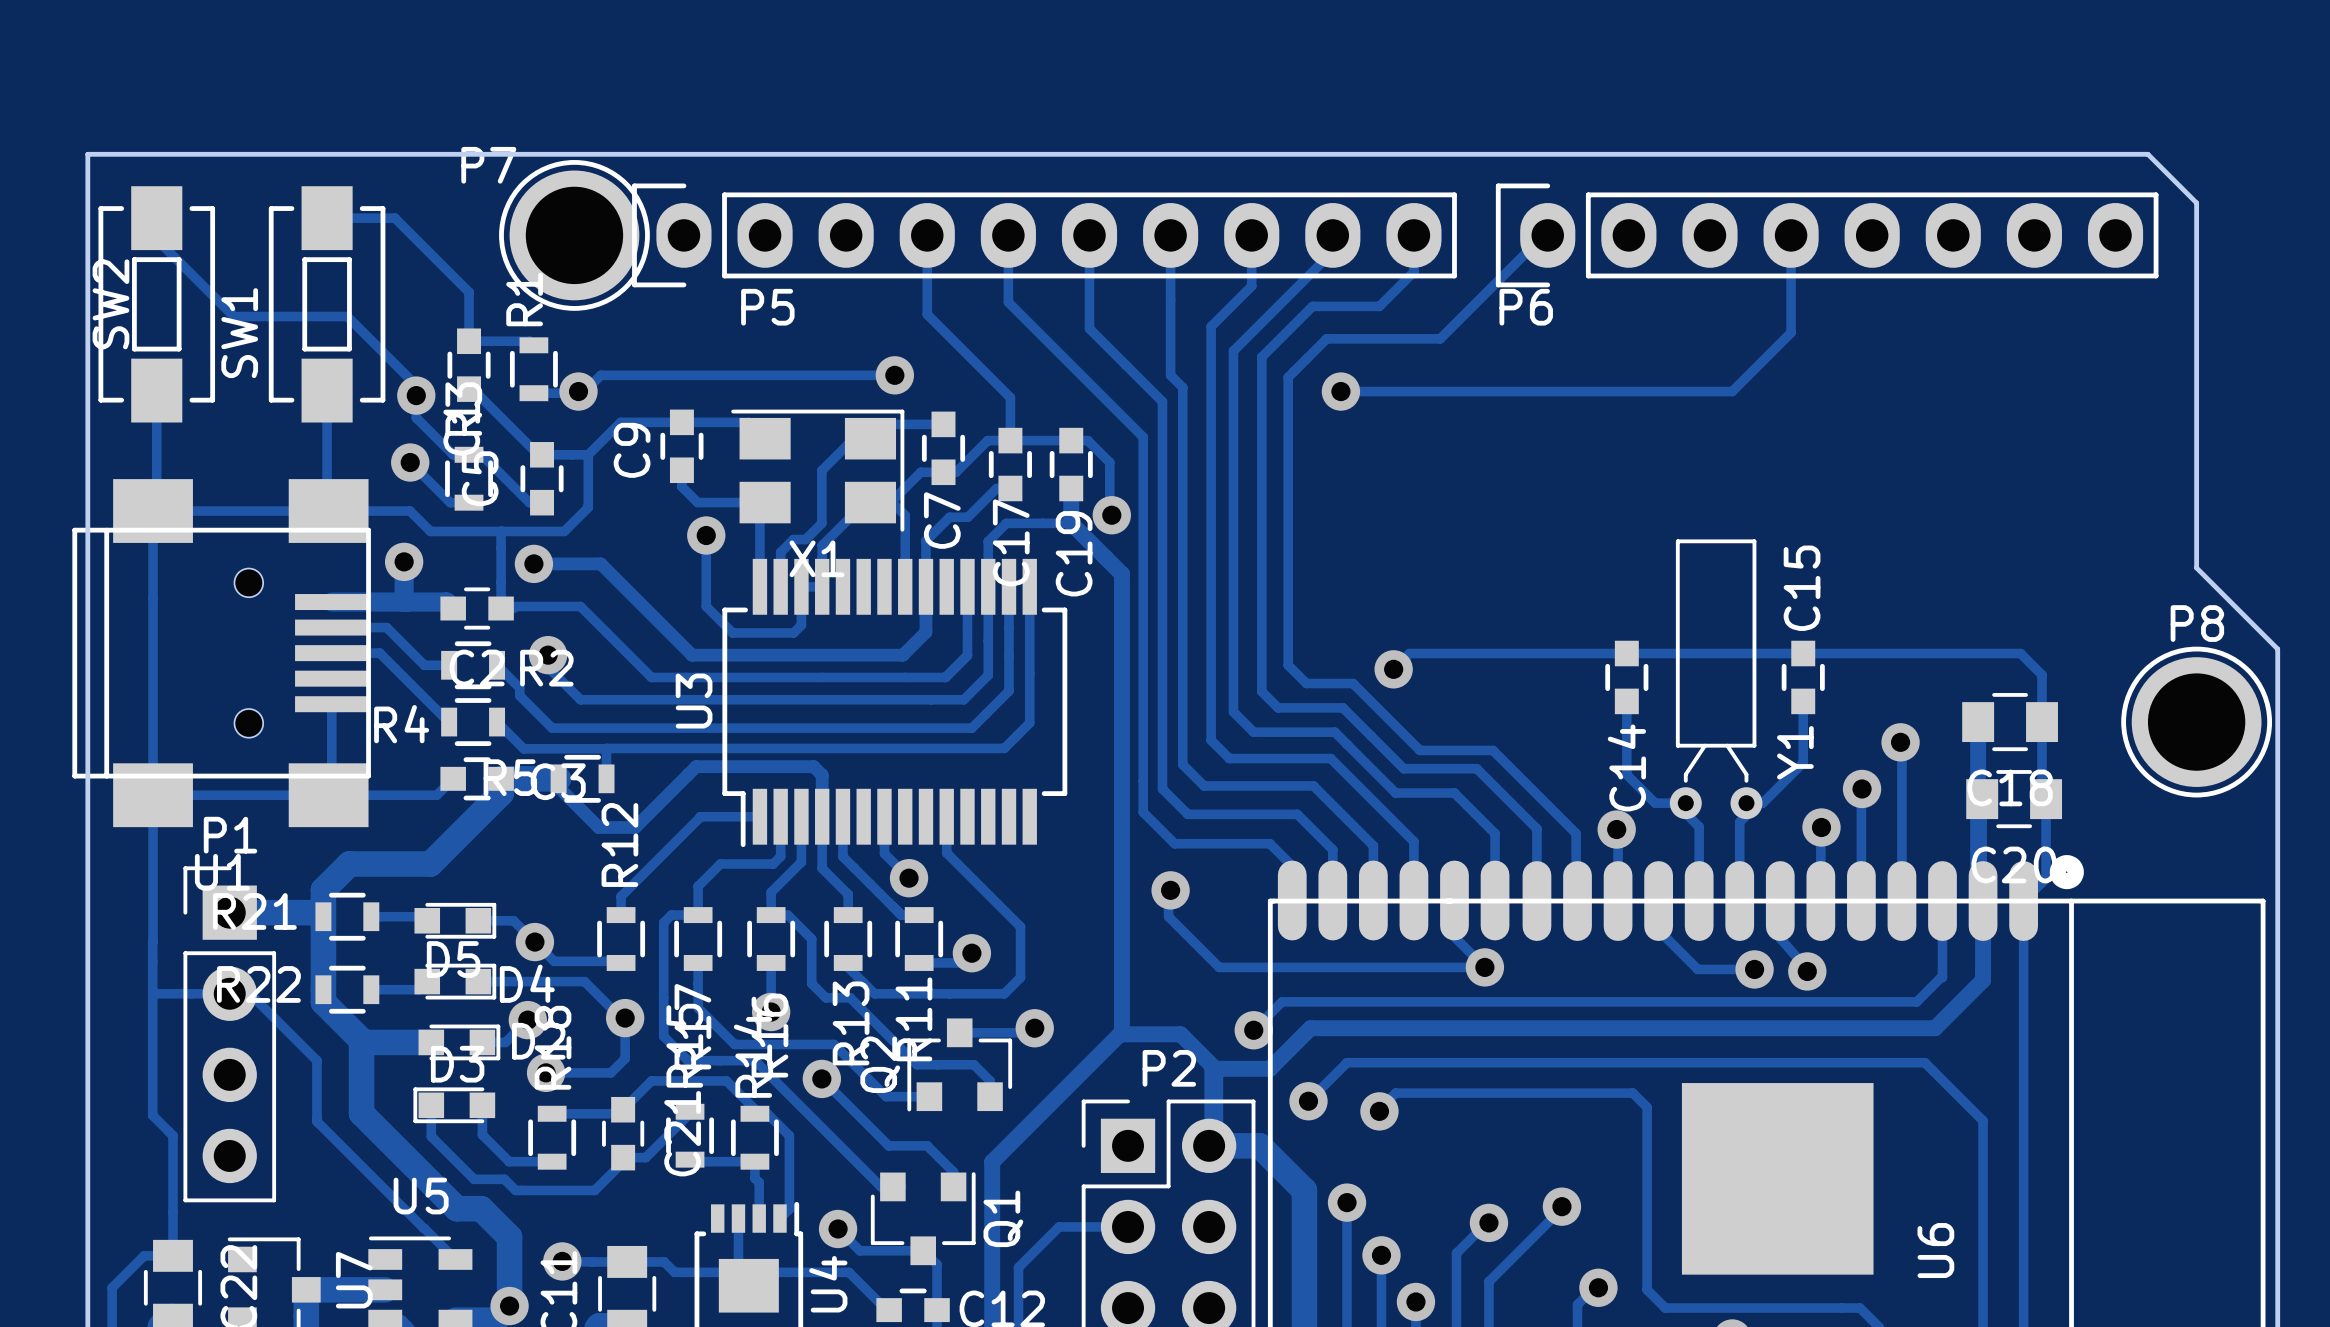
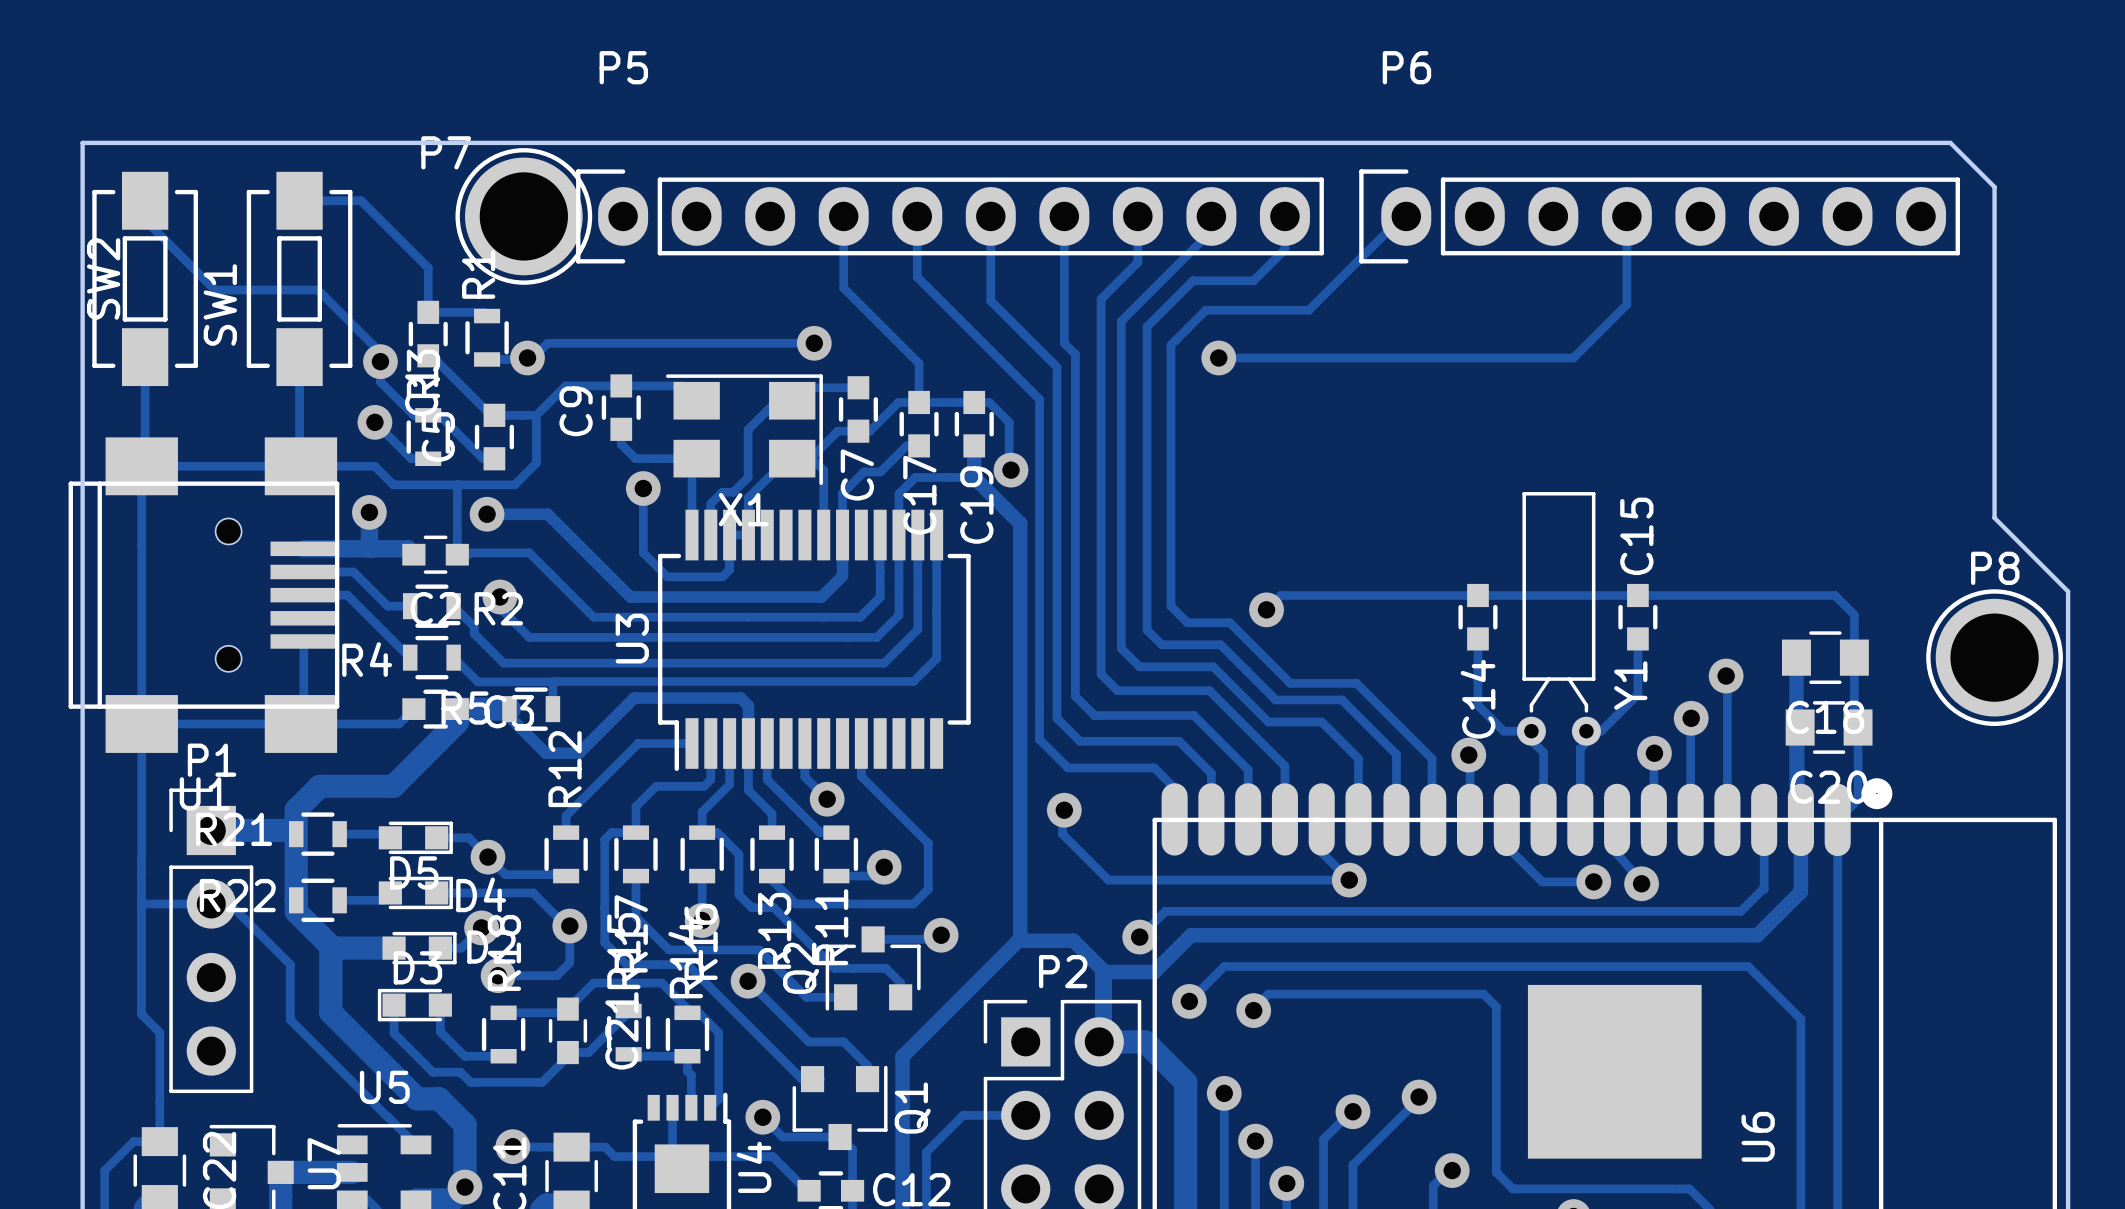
P5 name position: P5 (767, 307) -> P5 (623, 67)
P6 name position: P6 (1526, 307) -> P6 (1406, 67)

